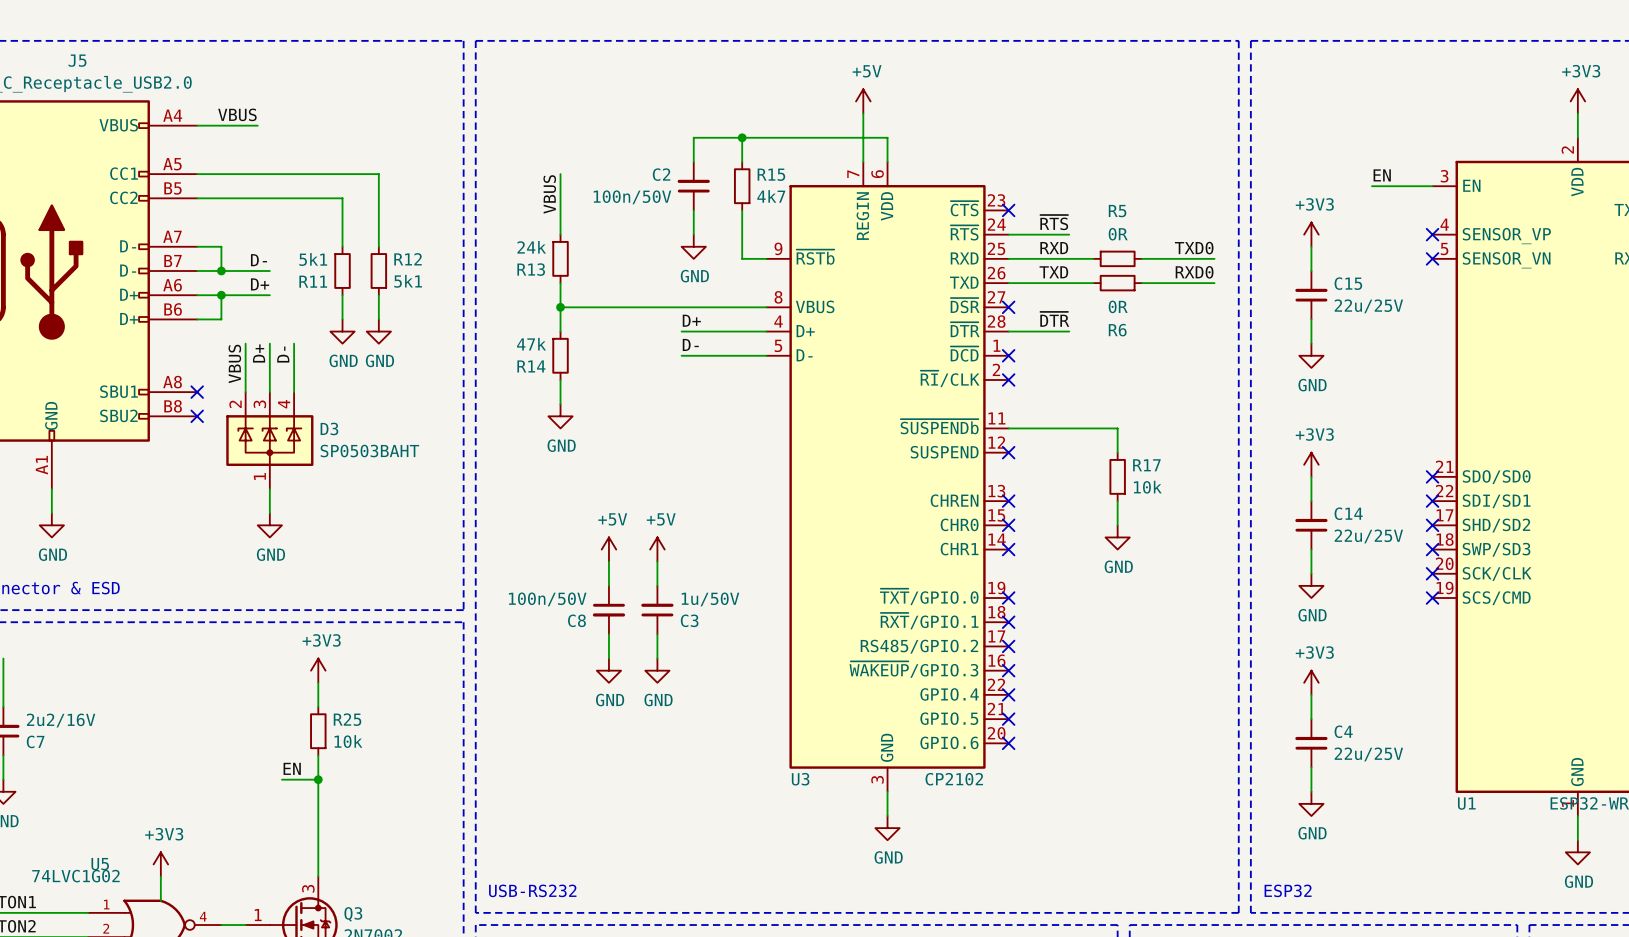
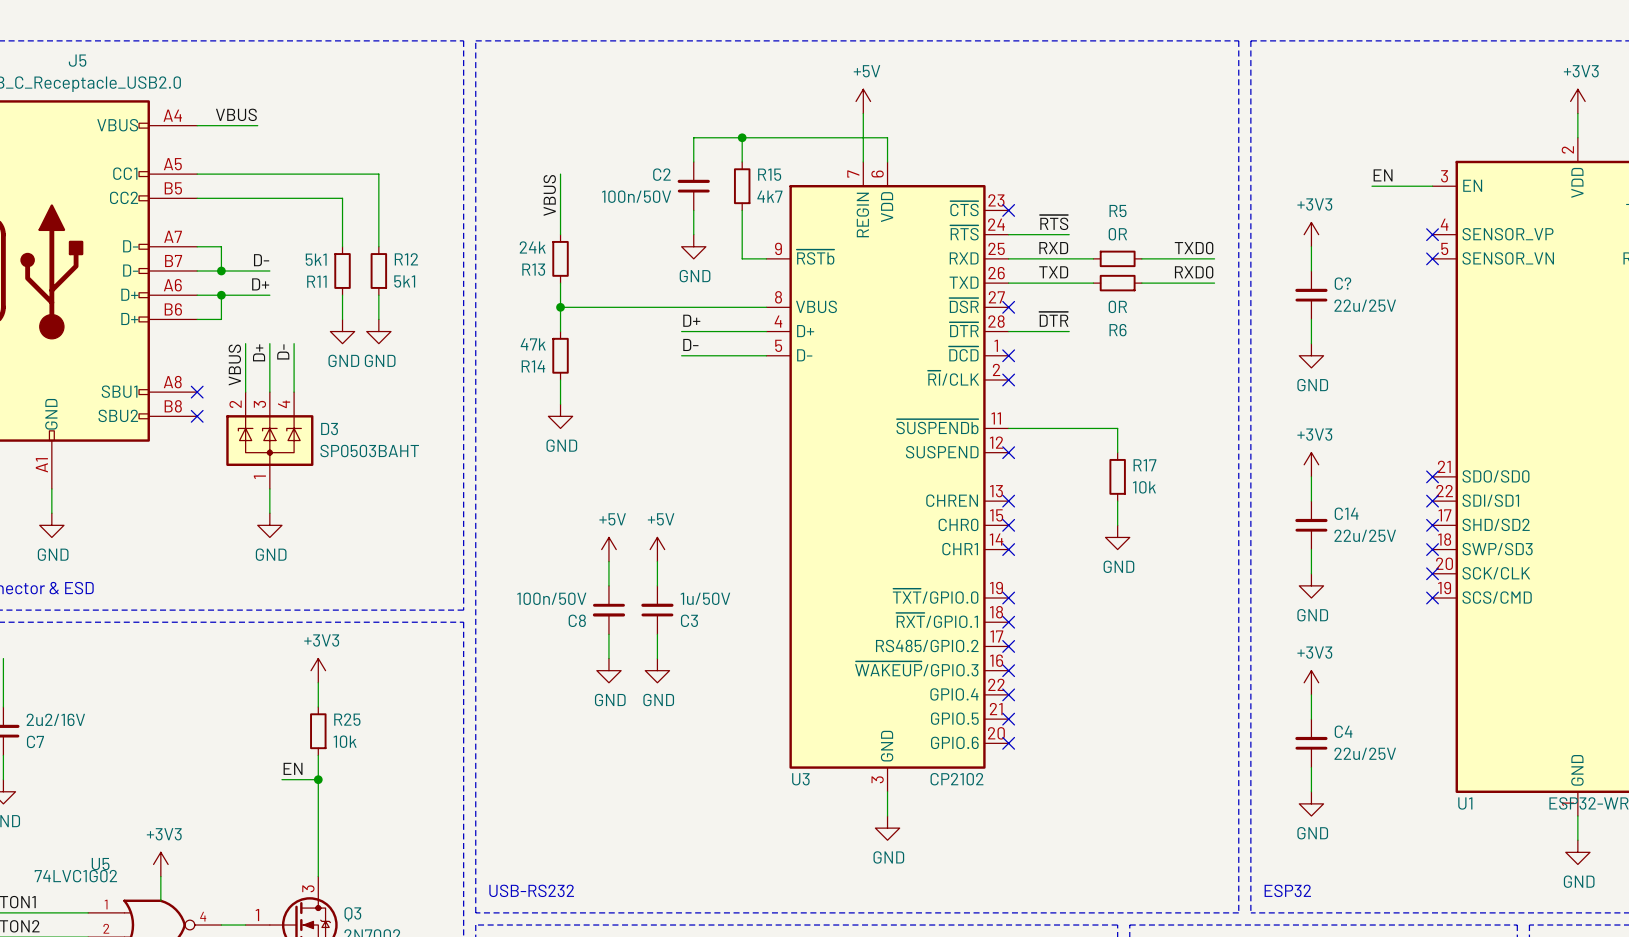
C15 name: C15 (1348, 283) -> C? (1342, 283)

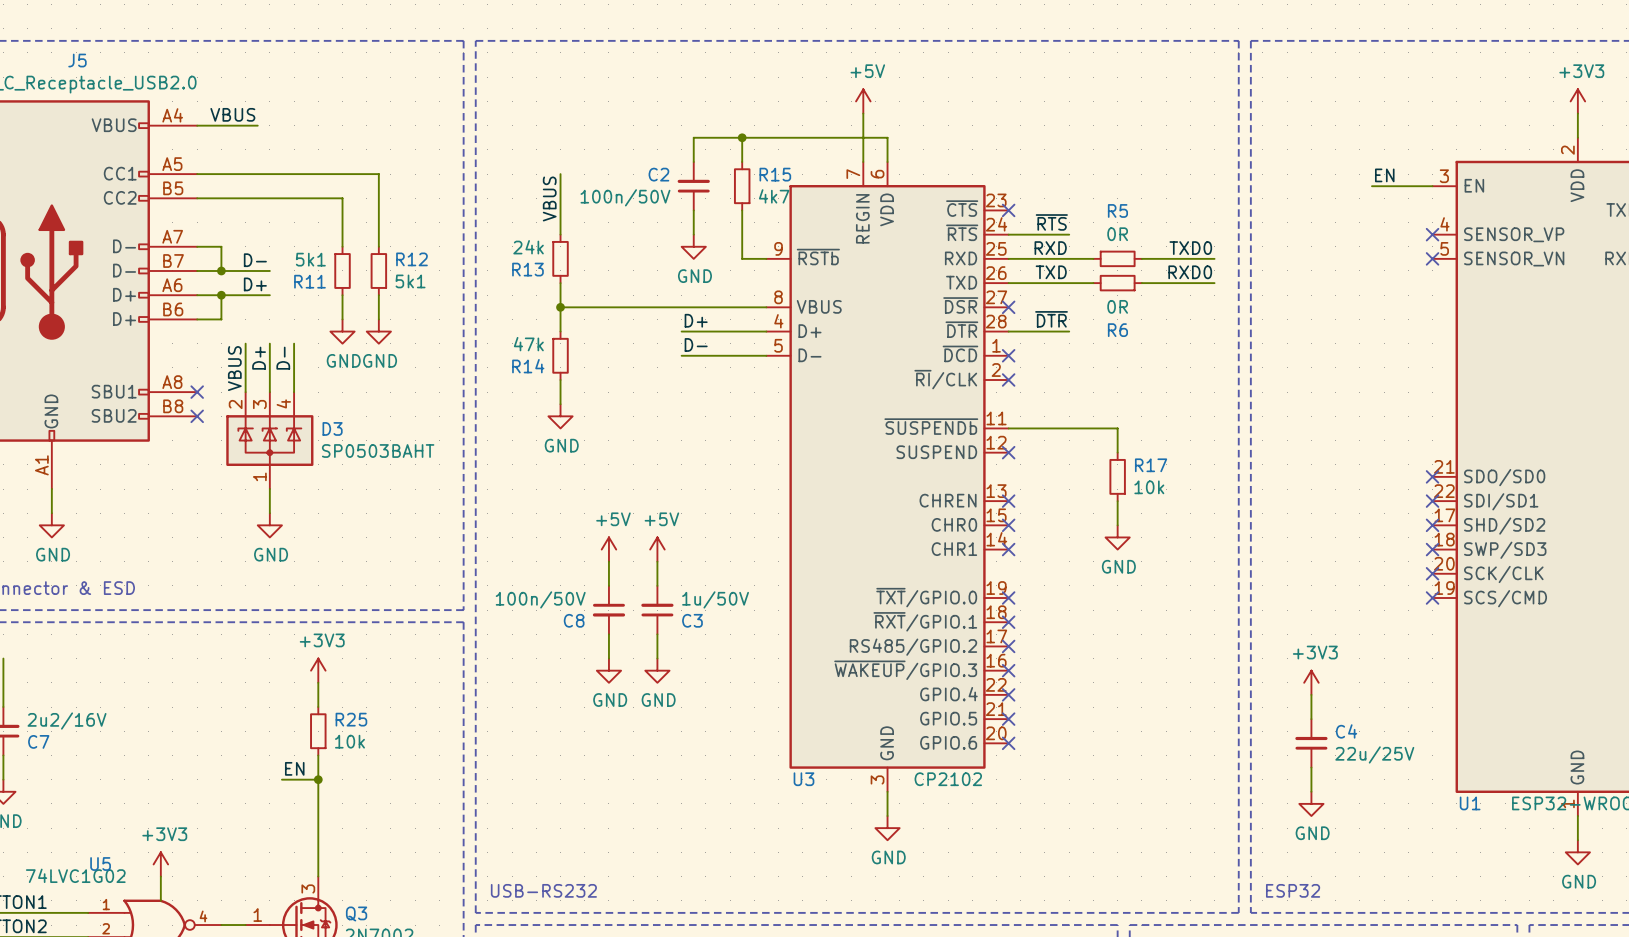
power symbol: +3V3 (1311, 234) -> none
wire: (1311, 246) (1311, 270) -> none
C?: 22u/25V (1311, 295) -> none
wire: (1311, 319) (1311, 343) -> none
power symbol: GND (1311, 355) -> none
power symbol: +3V3 (1311, 464) -> none
wire: (1311, 476) (1311, 501) -> none
C14: 22u/25V (1311, 525) -> none
wire: (1311, 549) (1311, 573) -> none
power symbol: GND (1311, 585) -> none

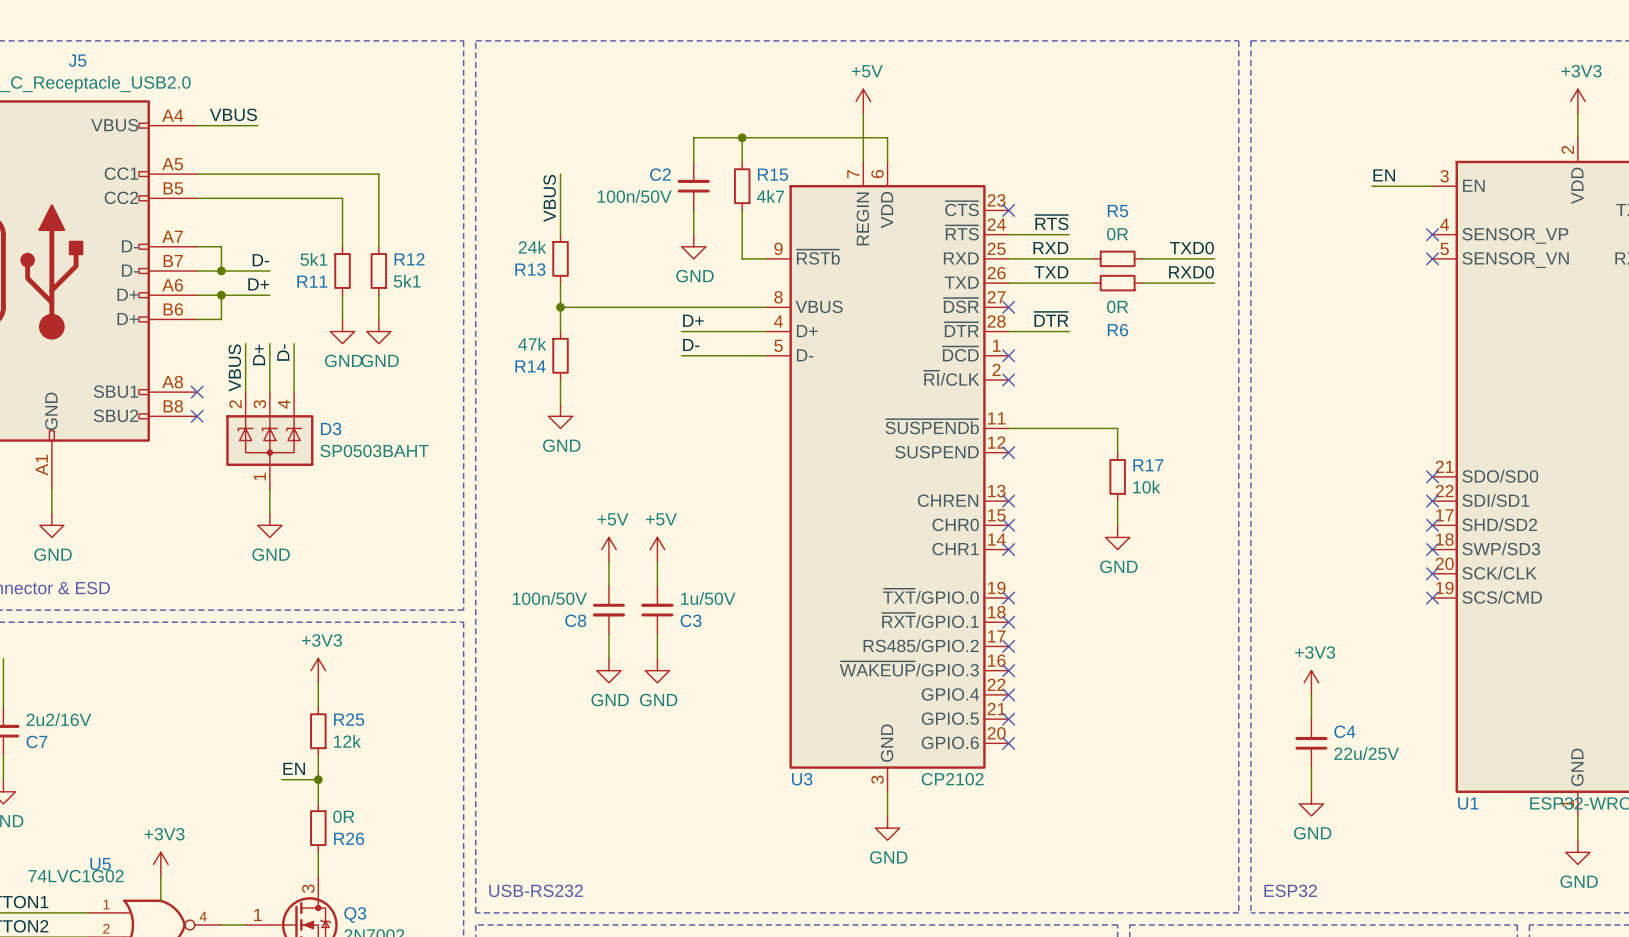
R25 value: 10k (349, 741) -> 12k (347, 741)
wire: (318, 803) (318, 852) -> none
R26: none -> 0R (318, 828)

